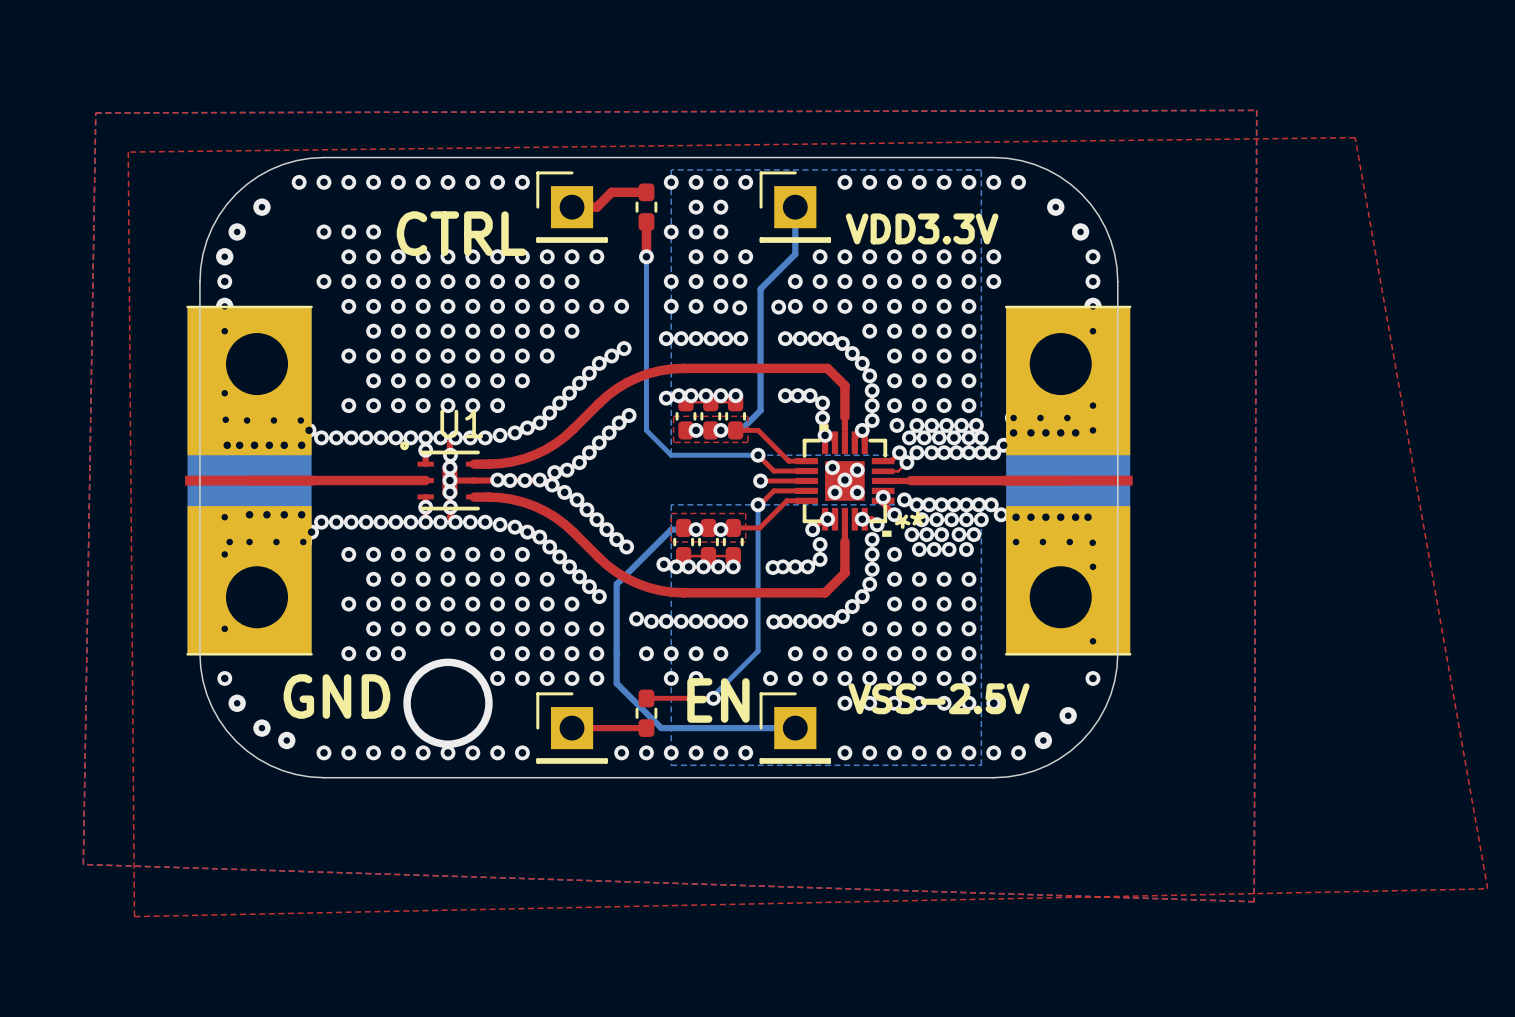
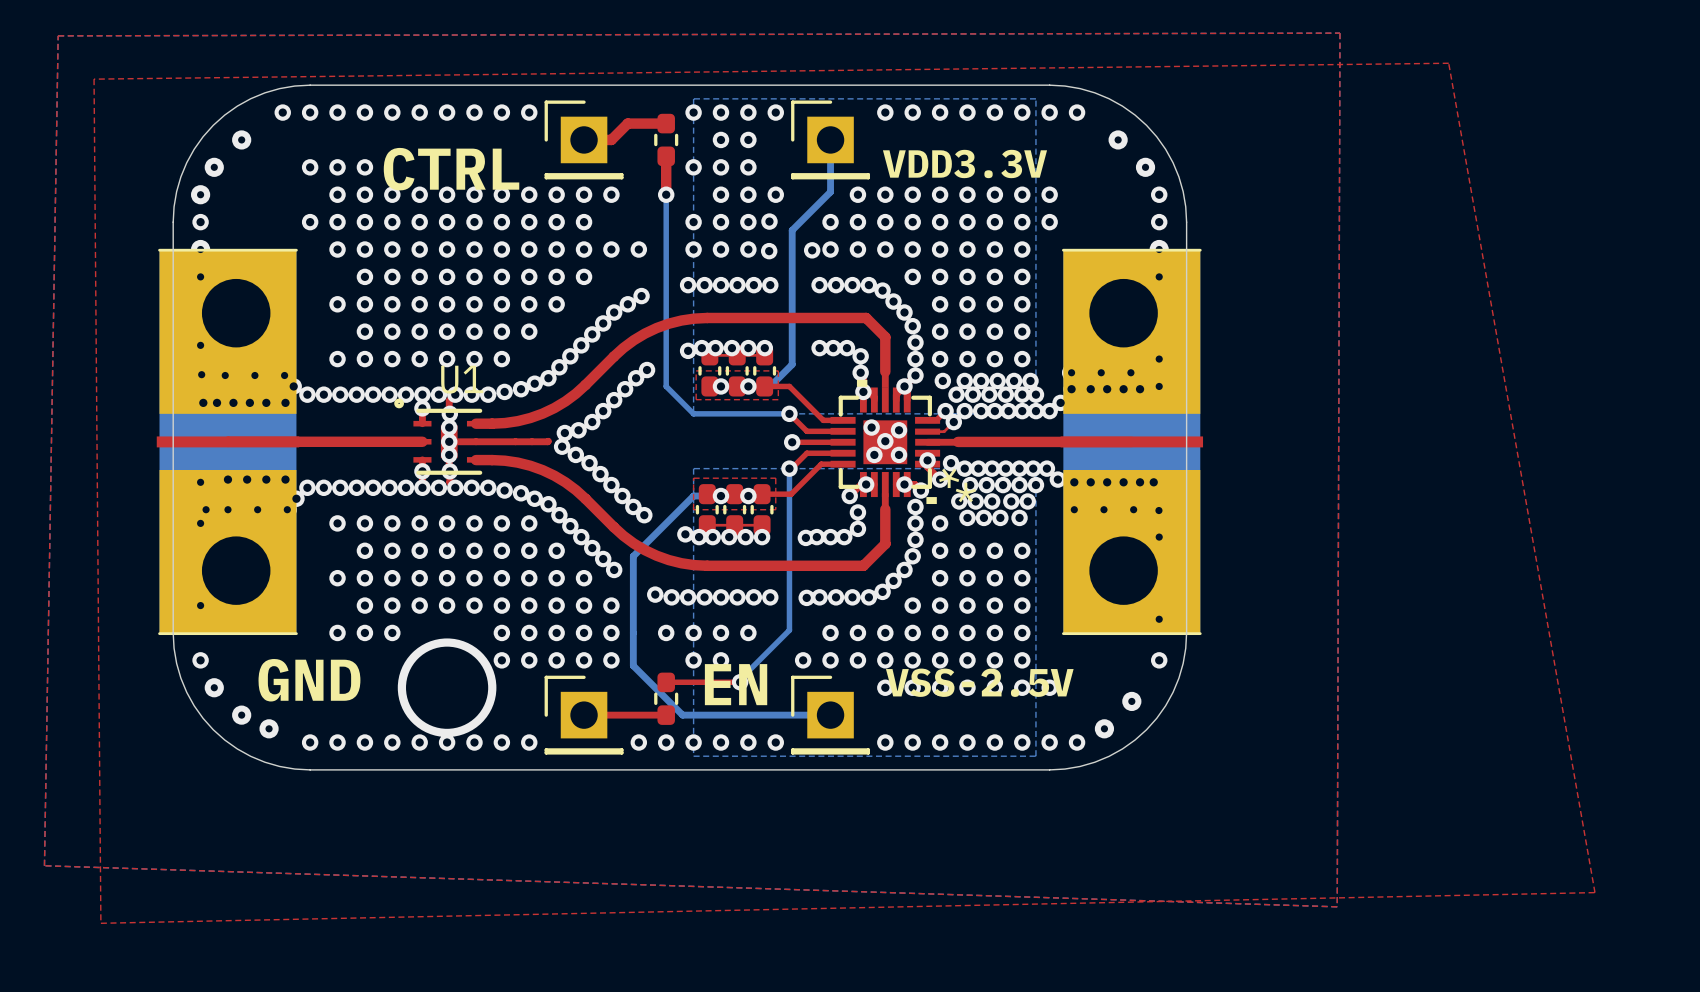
via: (497, 480) -> none
via: (510, 480) -> none
via: (524, 480) -> none
via: (539, 480) -> none

